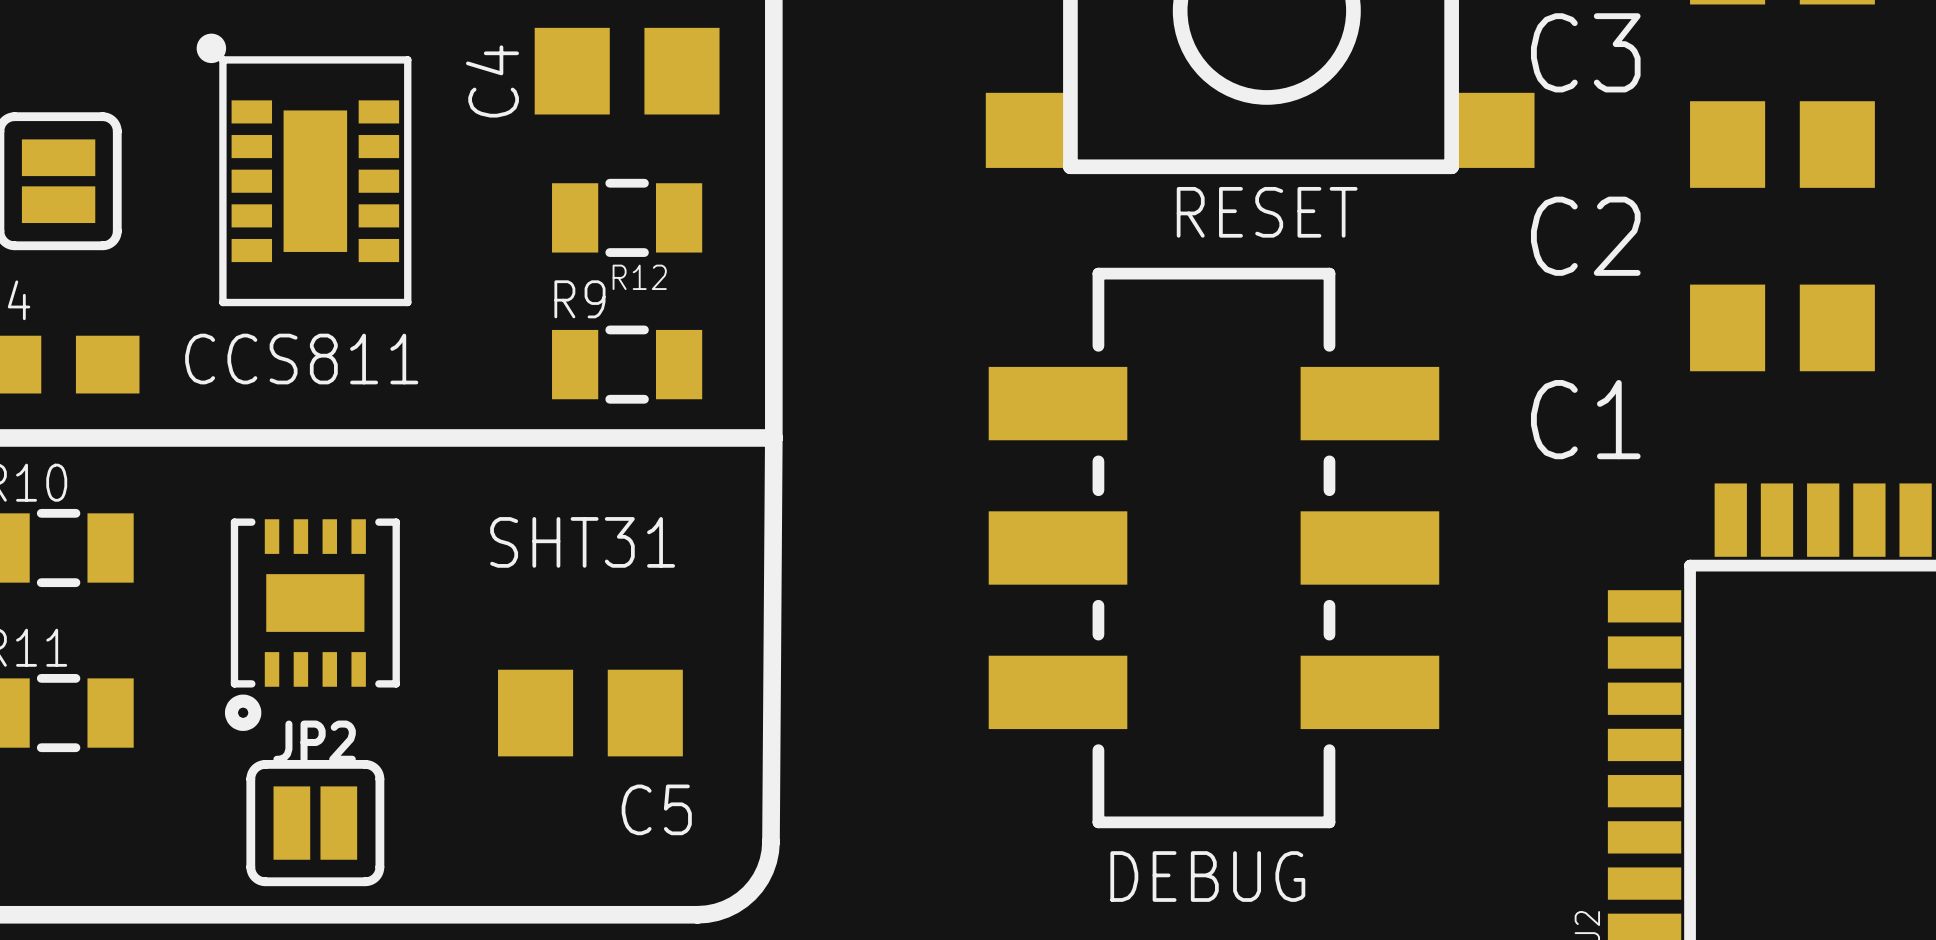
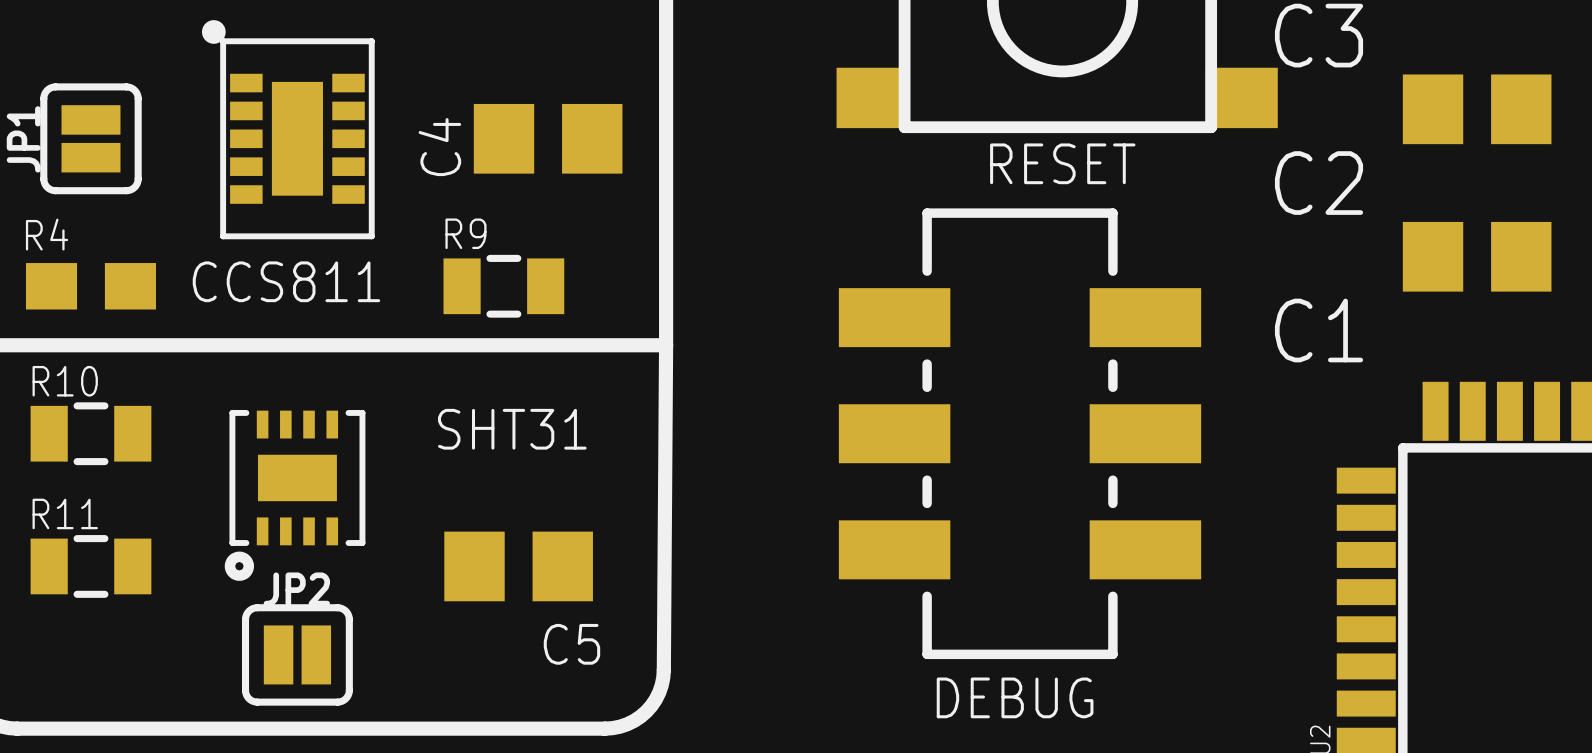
C4 position: (627, 71) -> (548, 138)
R12: (627, 217) -> none
R9 position: (627, 364) -> (503, 286)

